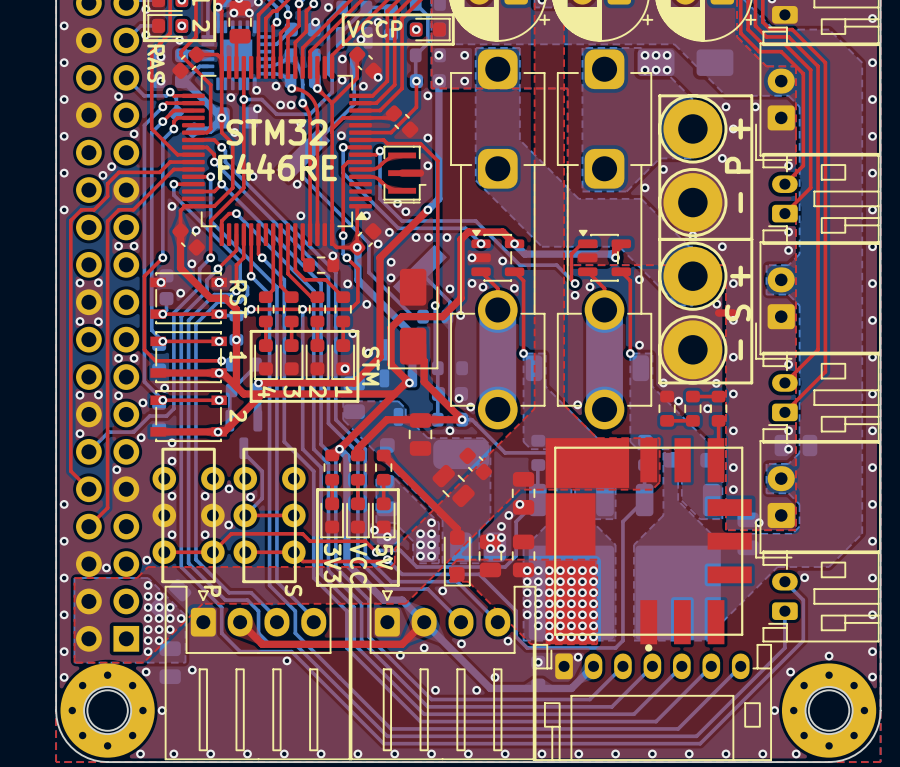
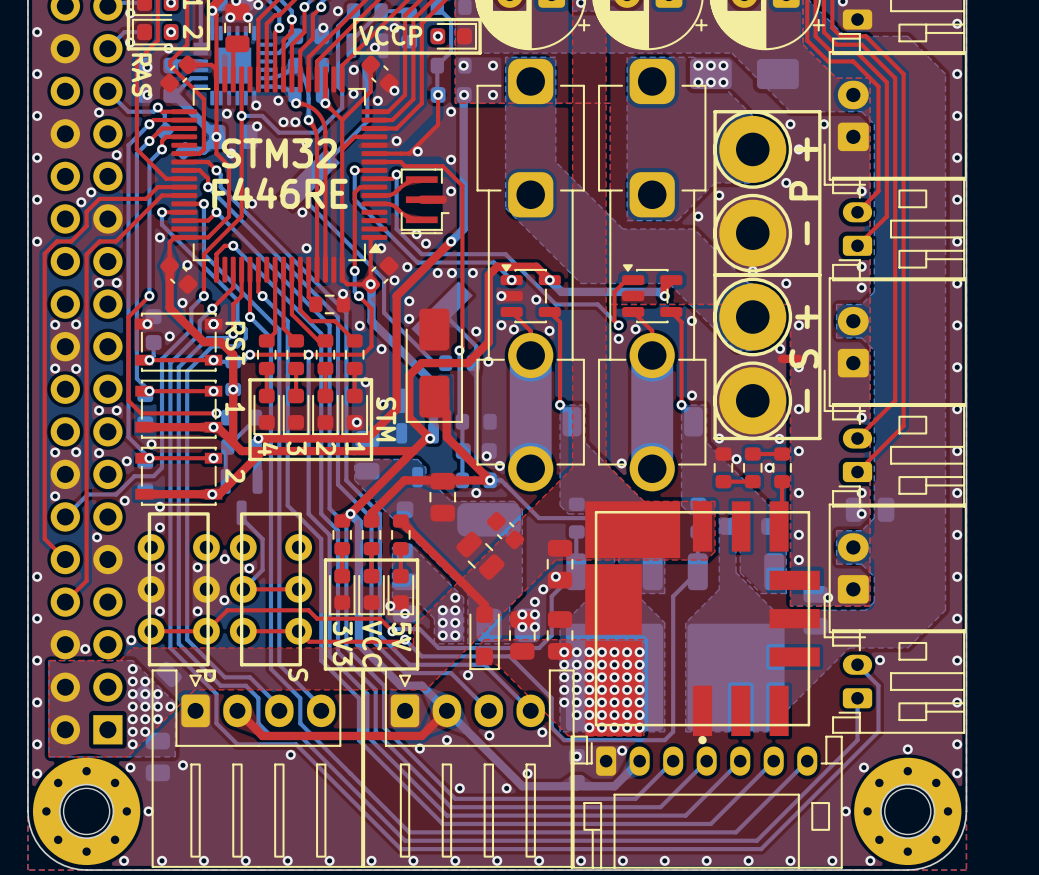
top track: (394, 113) (389, 117) (360, 117) -> none
via: none -> (396, 141)
part: (402, 121) -> none
via: none -> (417, 151)
via: (341, 135) -> none

